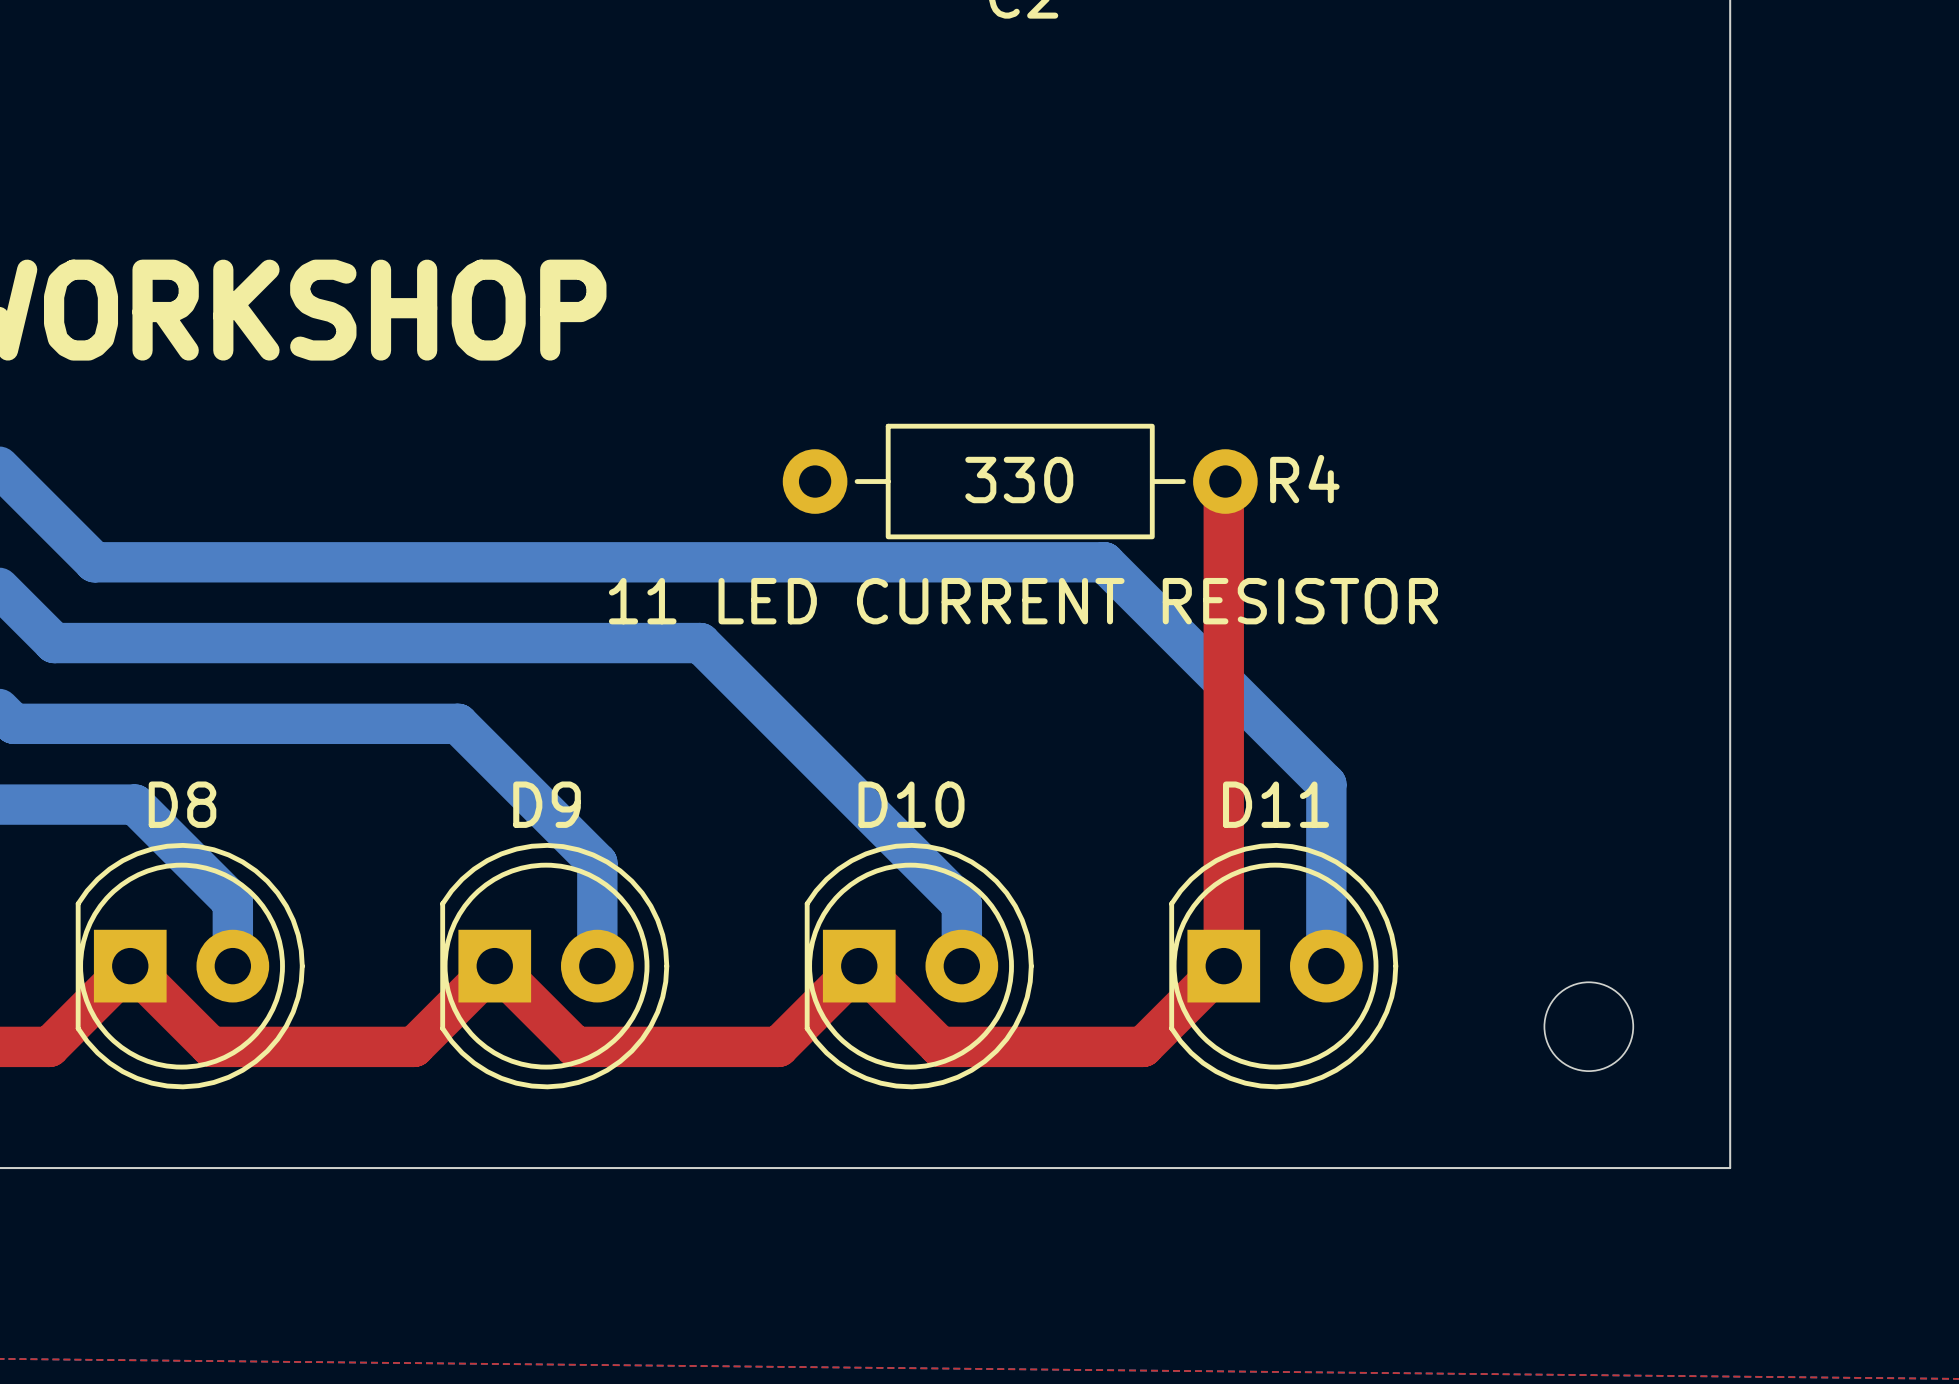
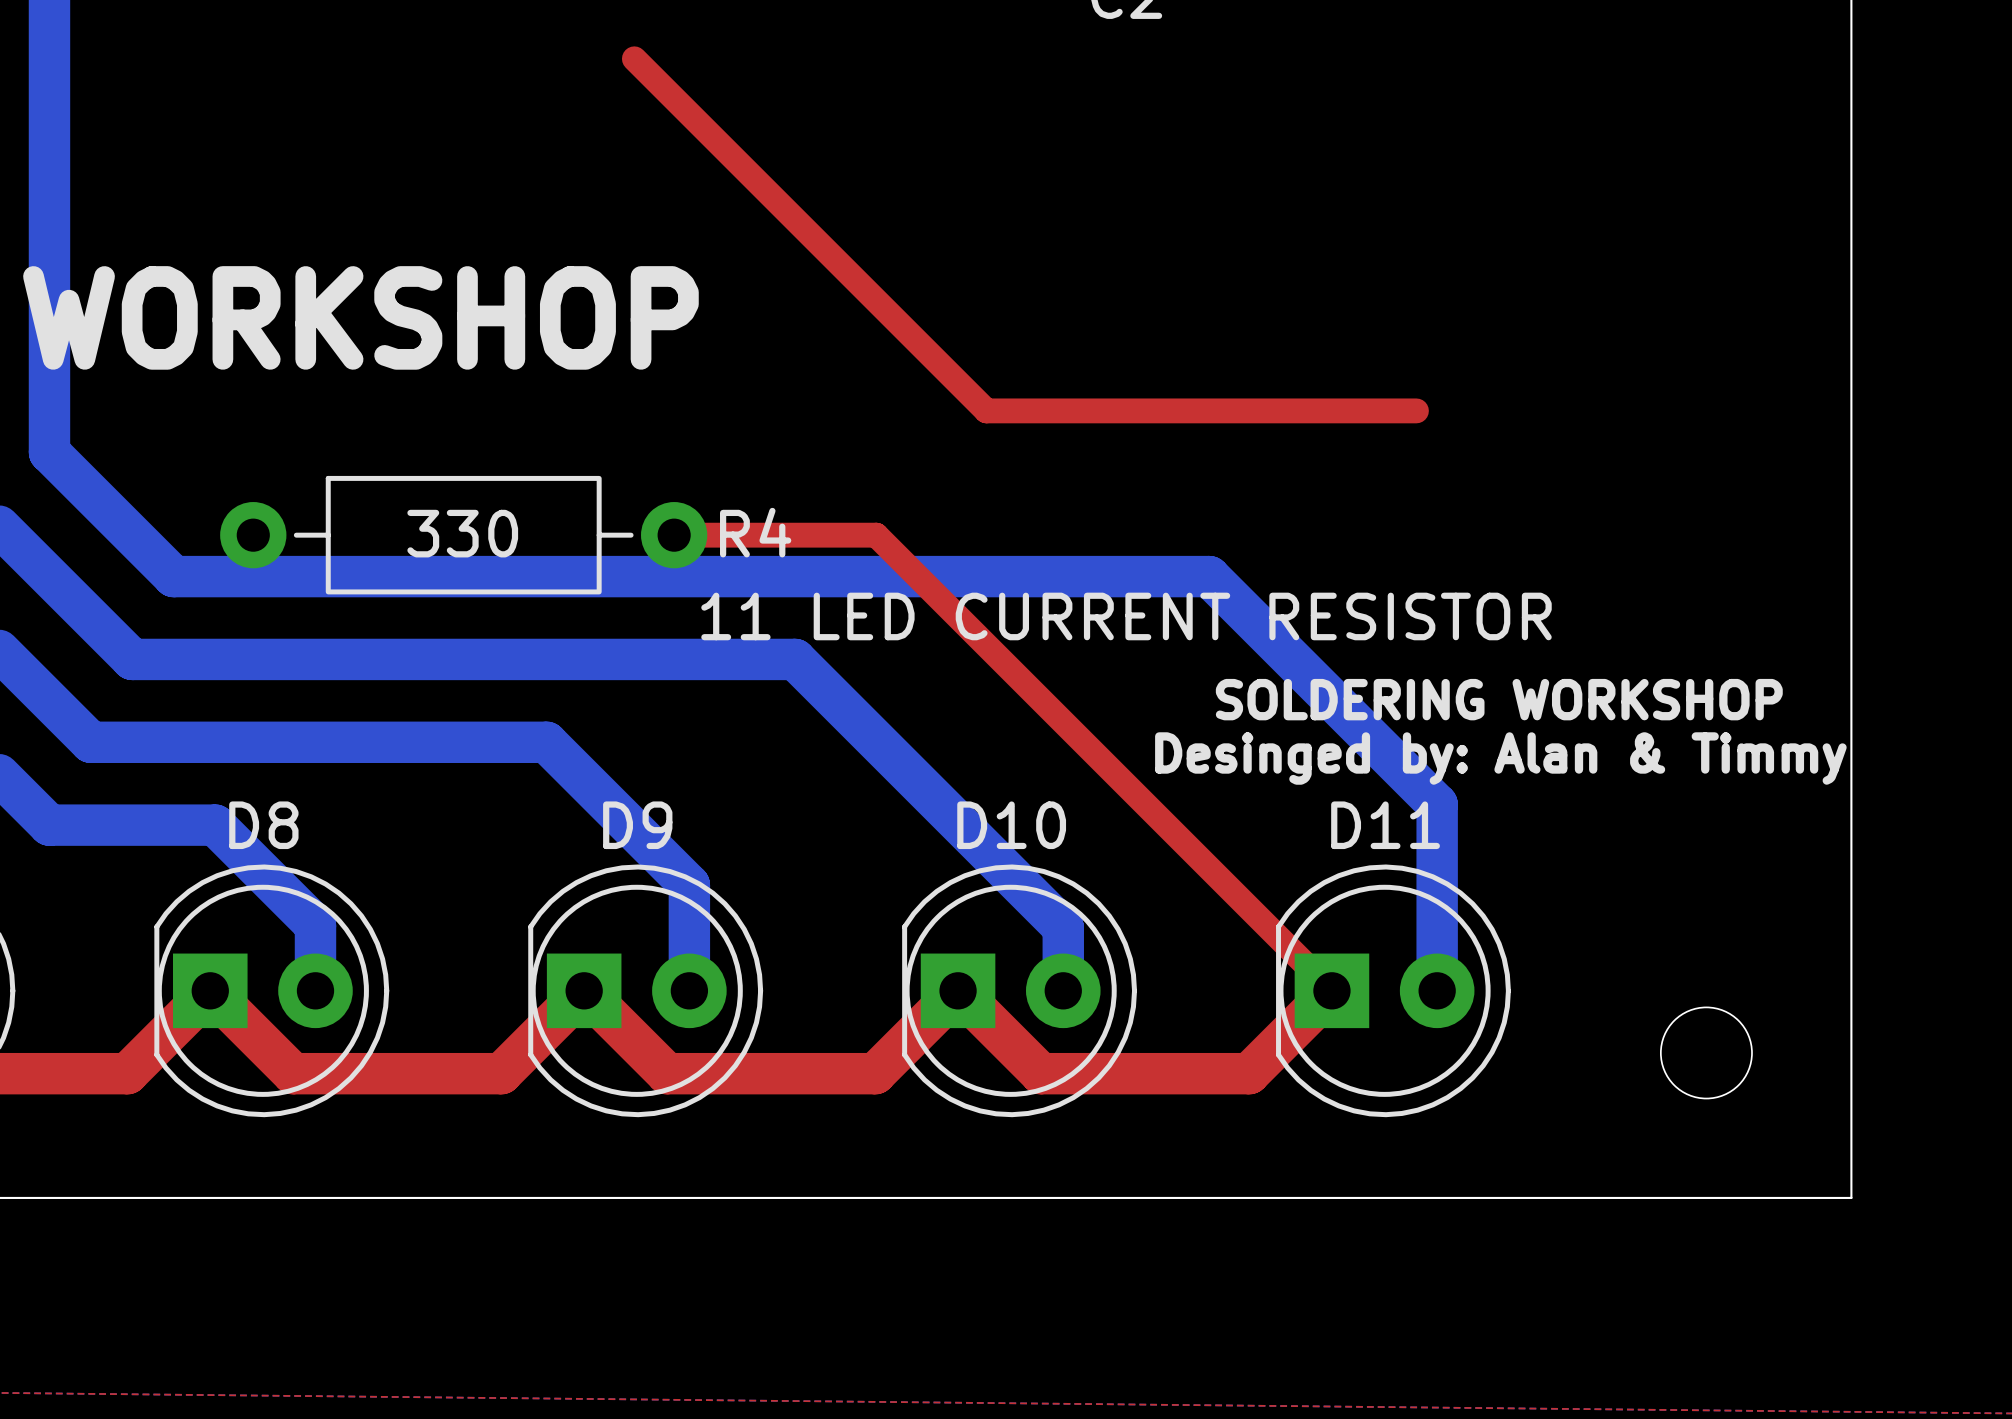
top track: none -> (634, 58) (986, 410) (1416, 410)
R4 position: (1020, 481) -> (463, 535)
top track: (1225, 481) (1223, 483) (1223, 966) -> (674, 535) (876, 535) (1331, 990)
text: none -> SOLDERING WORKSHOP (1499, 699)
text: none -> Desinged by: Alan & Timmy (1500, 758)

